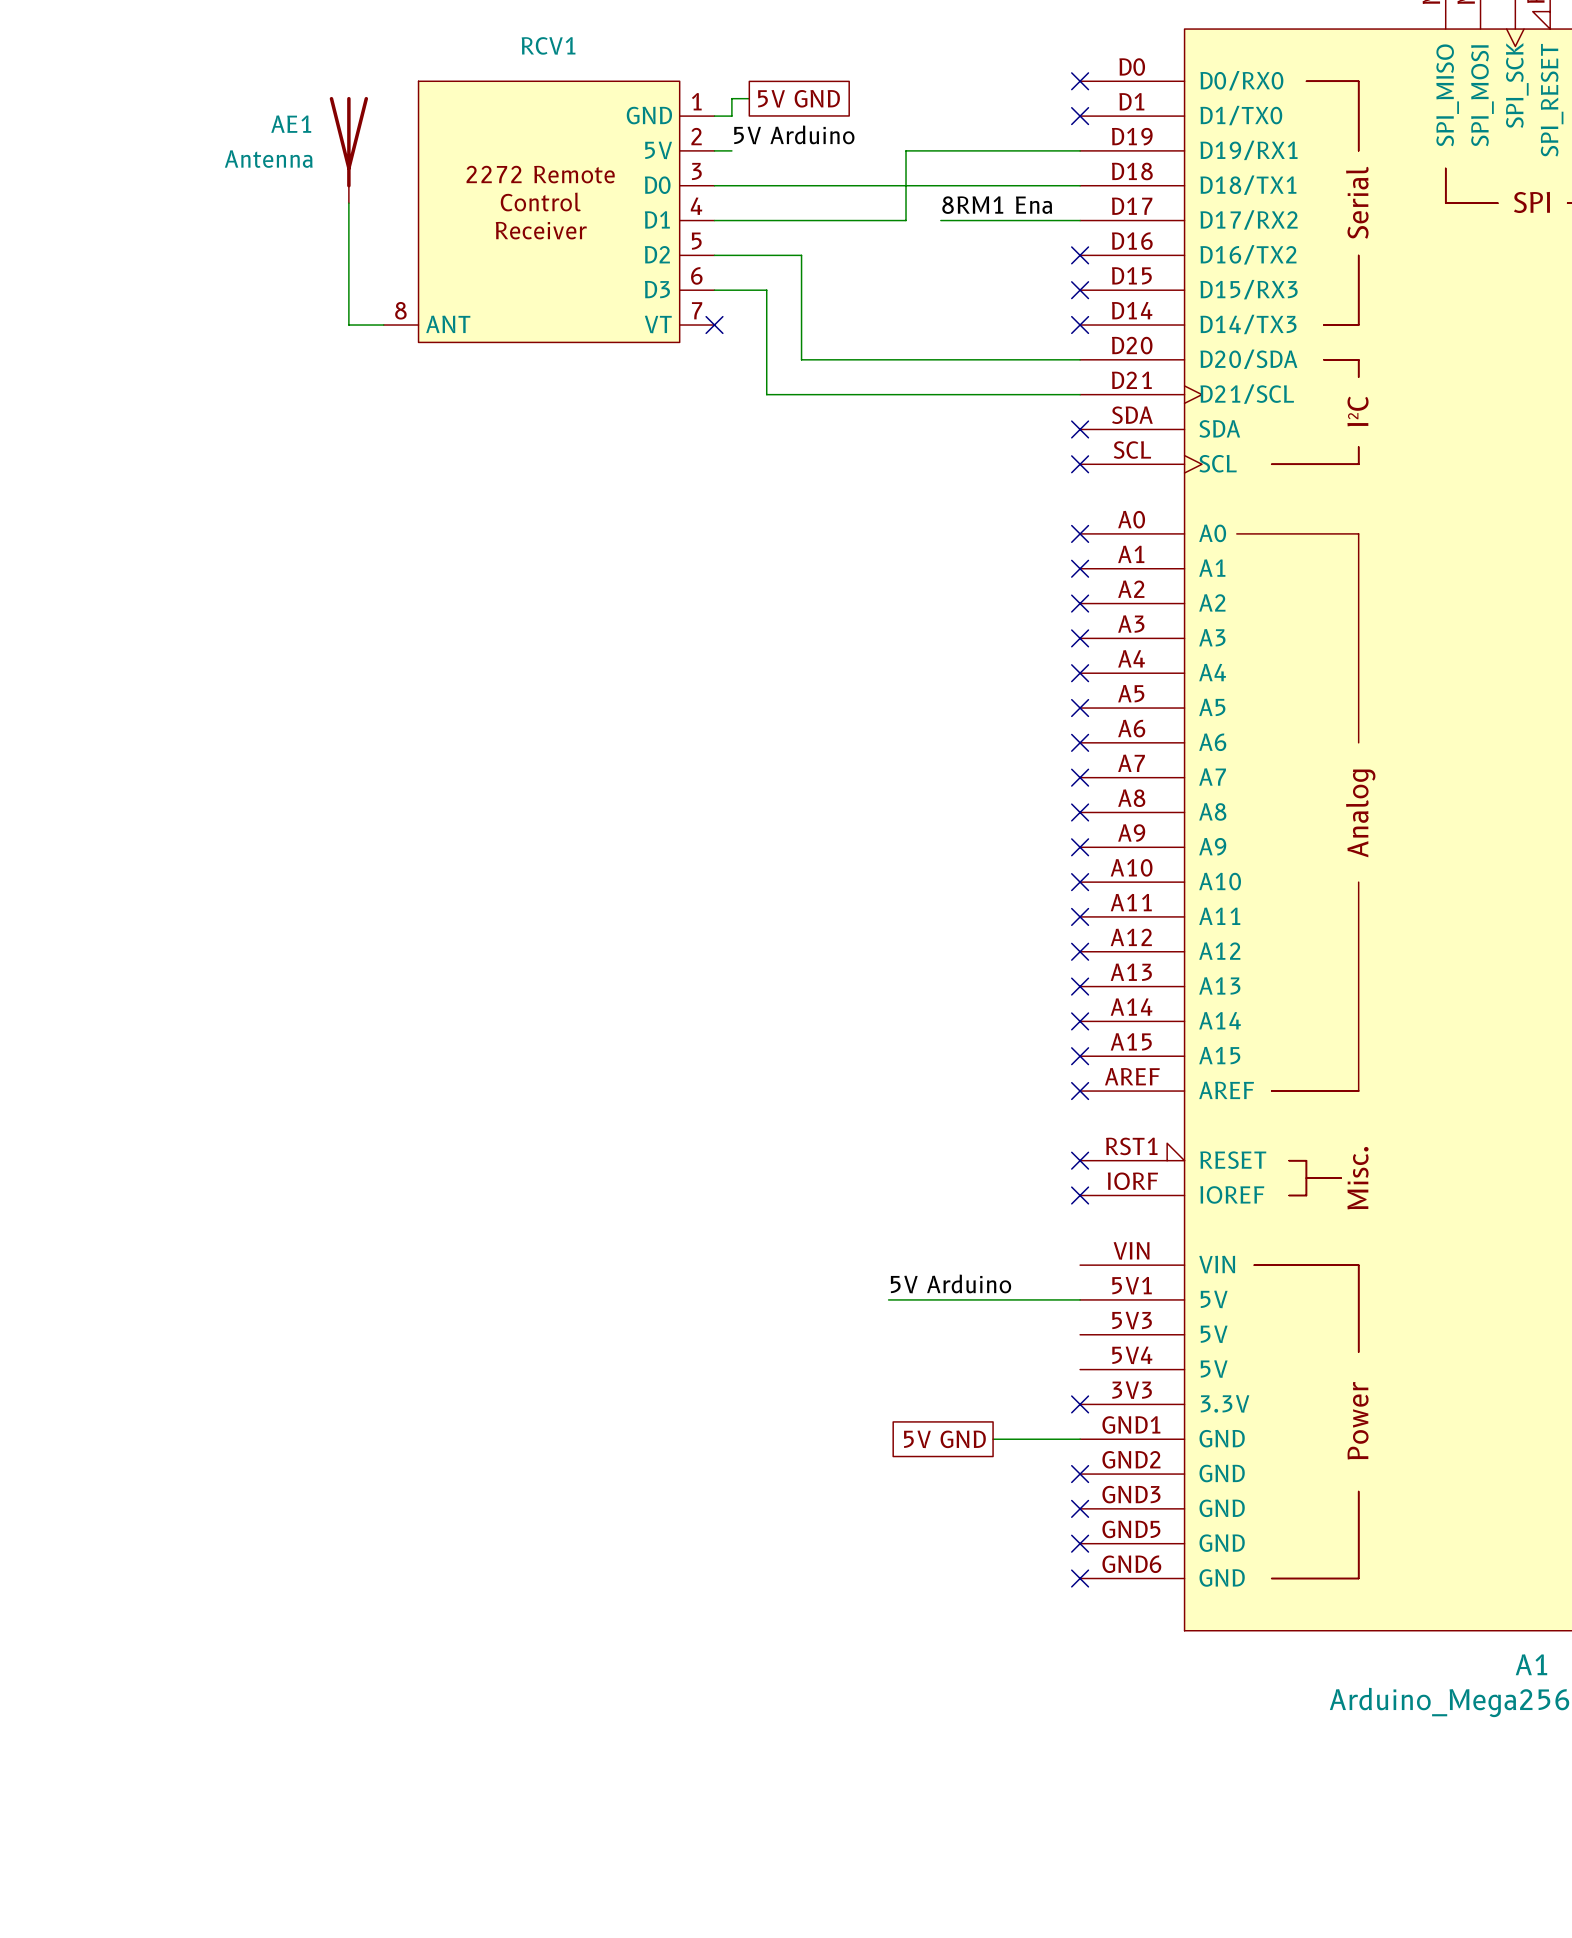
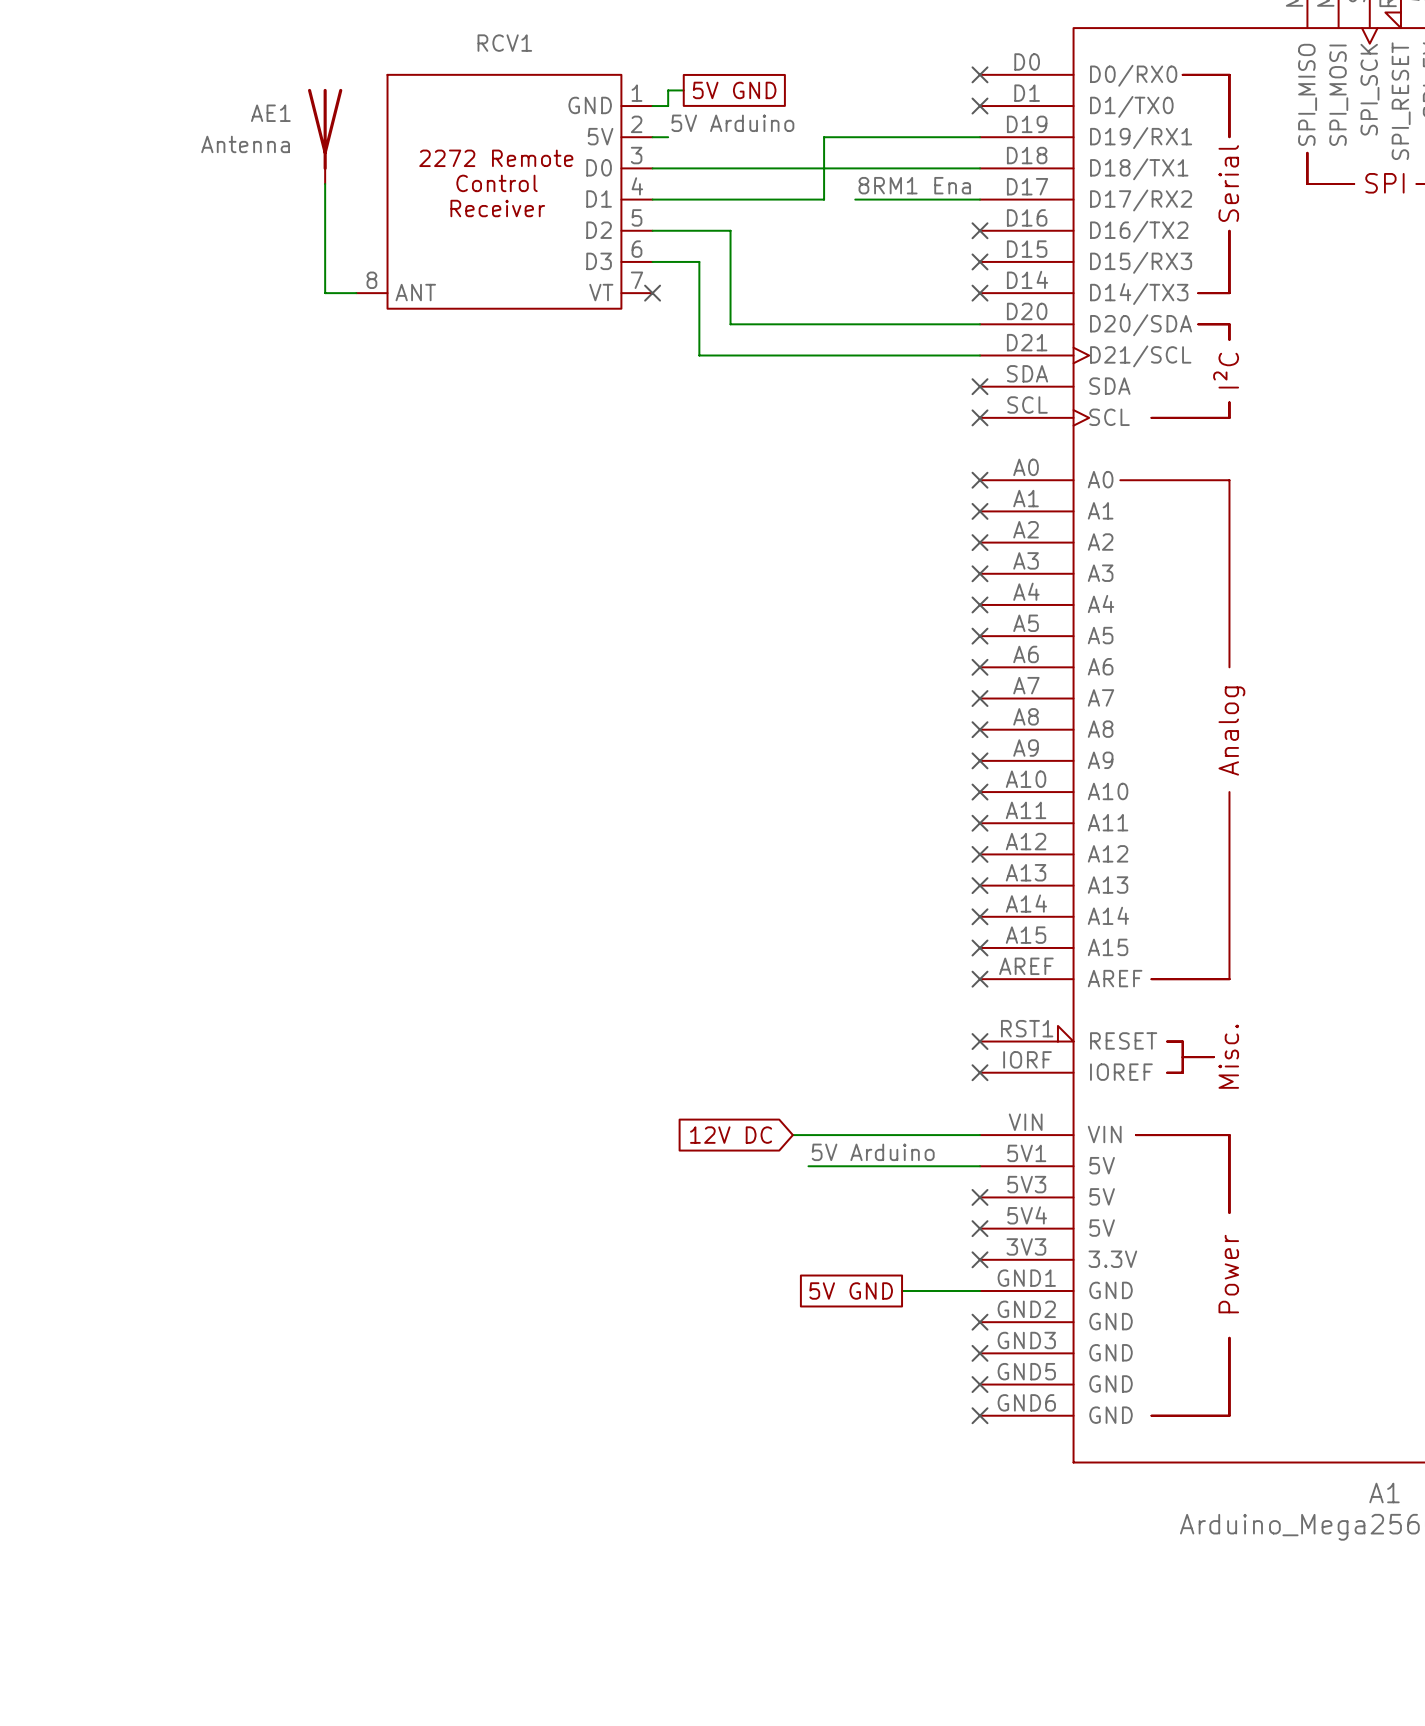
global label: none -> 12V DC (731, 1135)
wire: none -> (792, 1135) (980, 1135)
no-connect mark: none -> (980, 1197)
no-connect mark: none -> (980, 1228)

